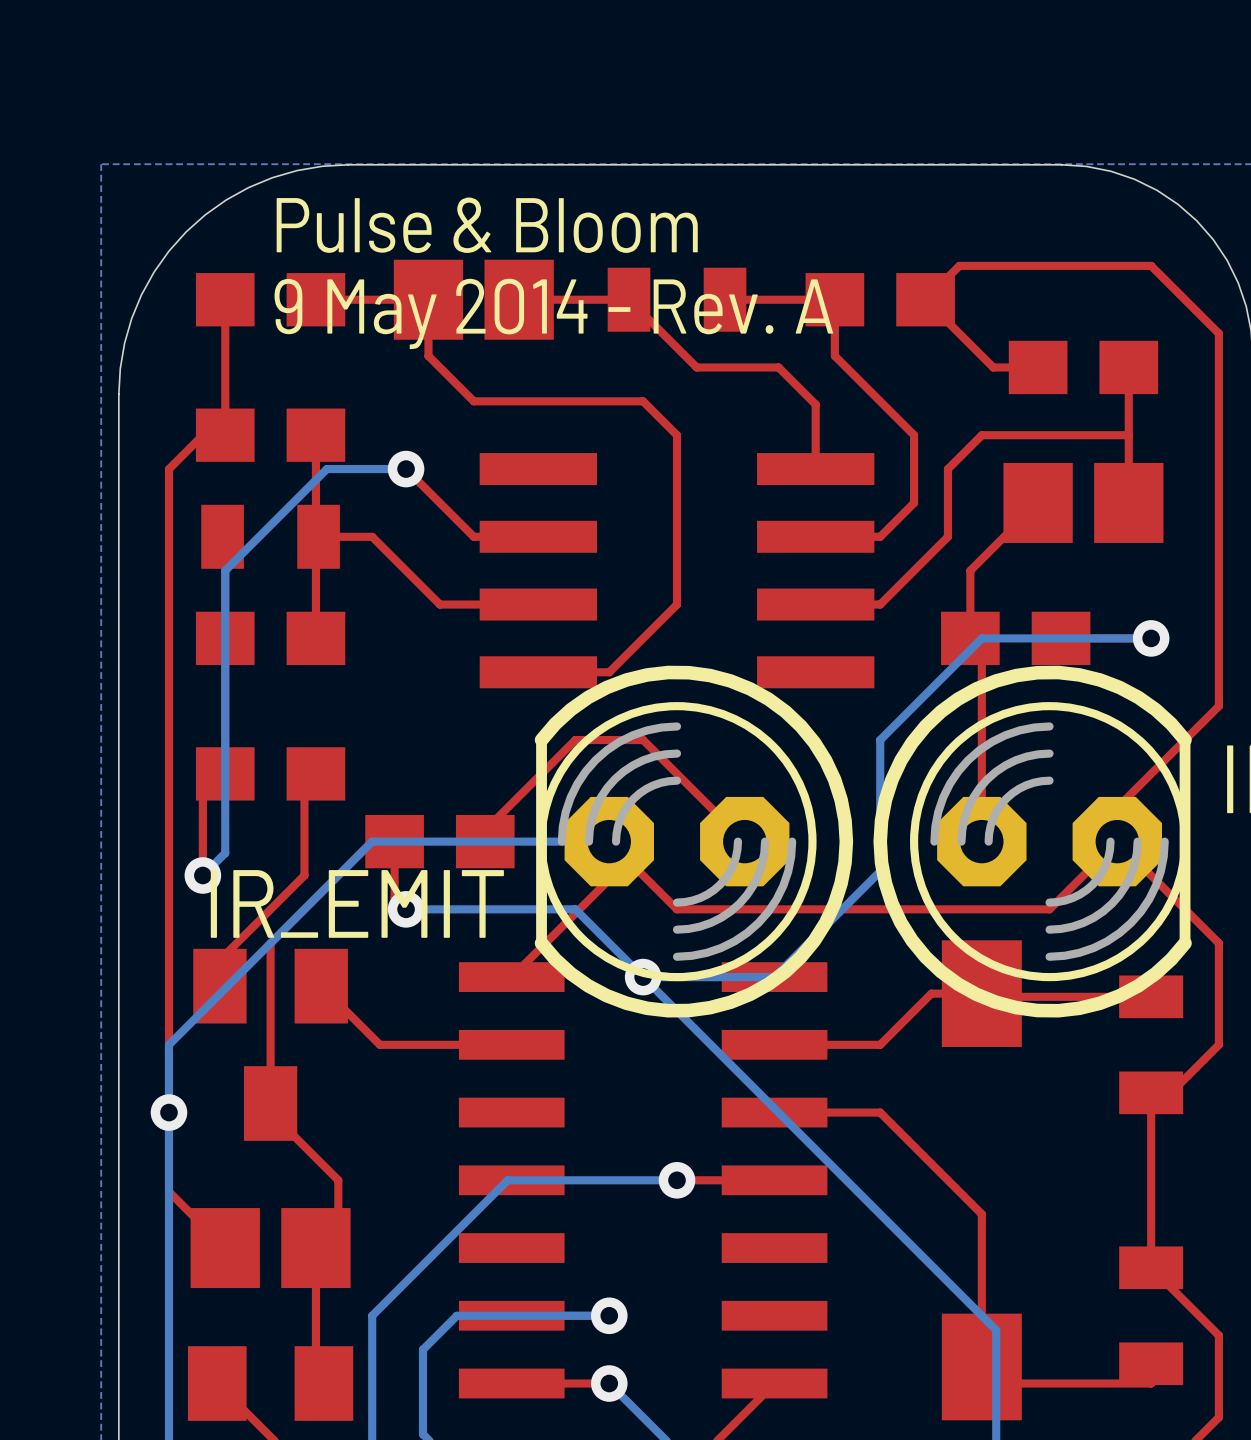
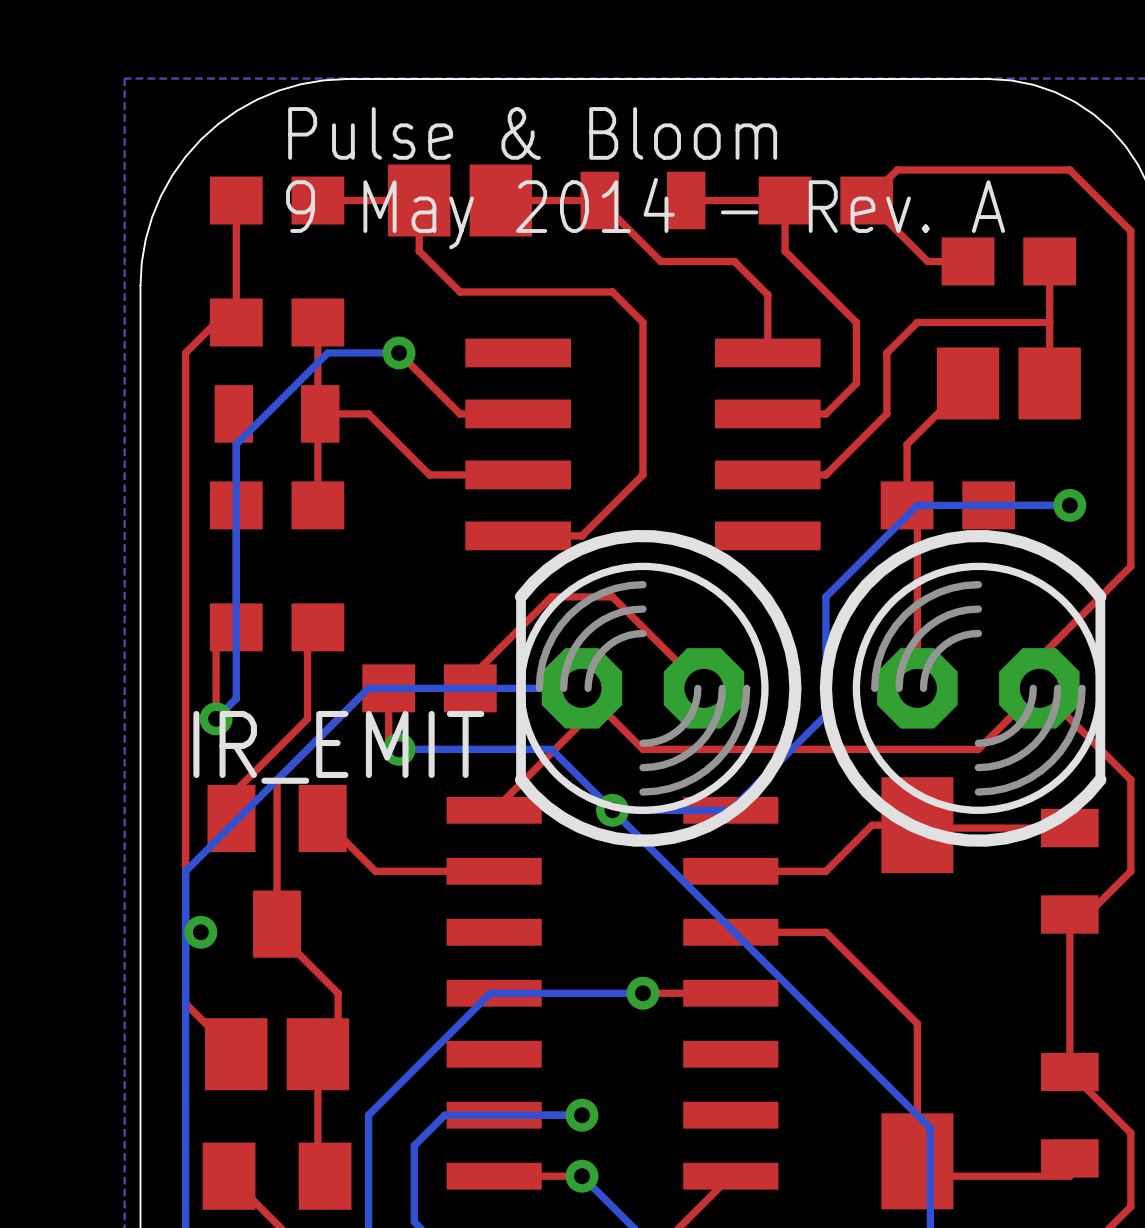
via position: (168, 1112) -> (200, 932)

